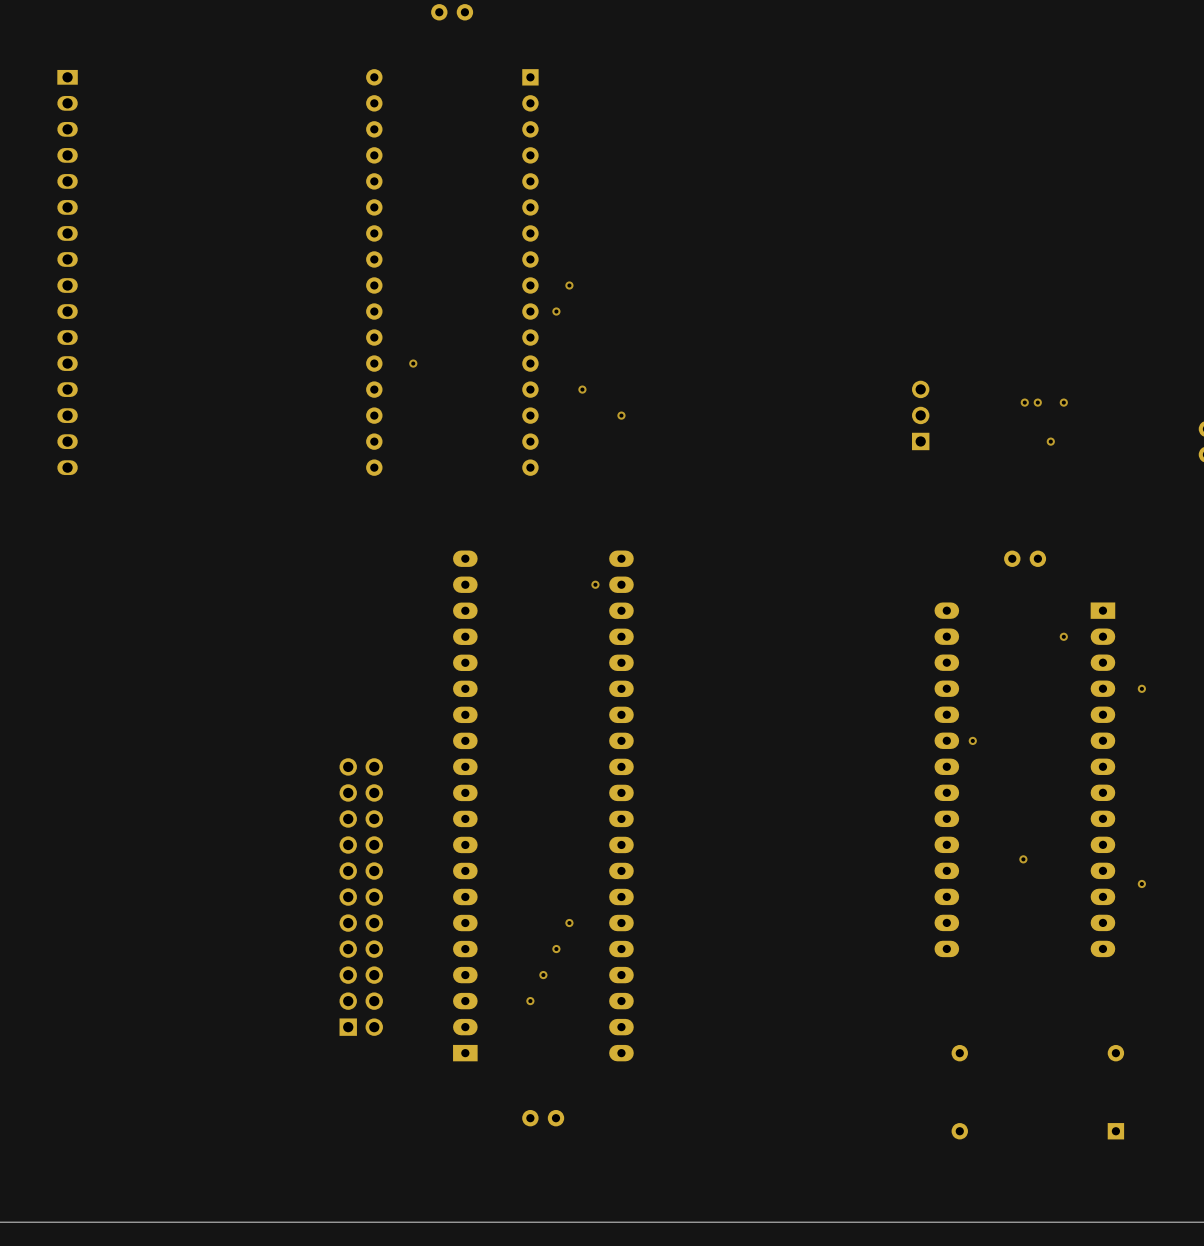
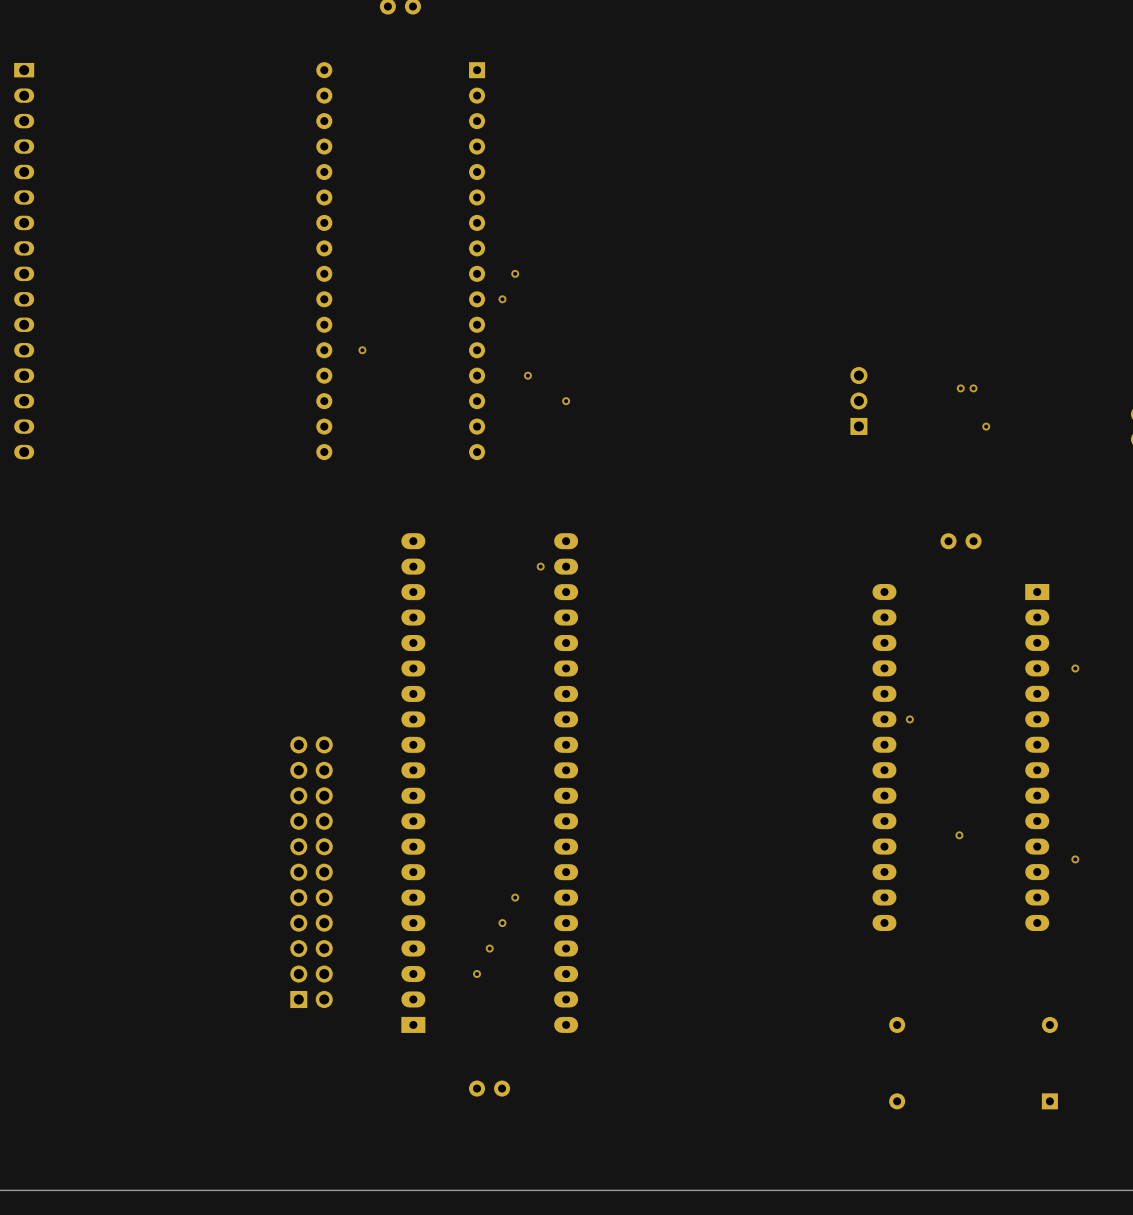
via: (1063, 402) -> none
via: (1063, 636) -> none

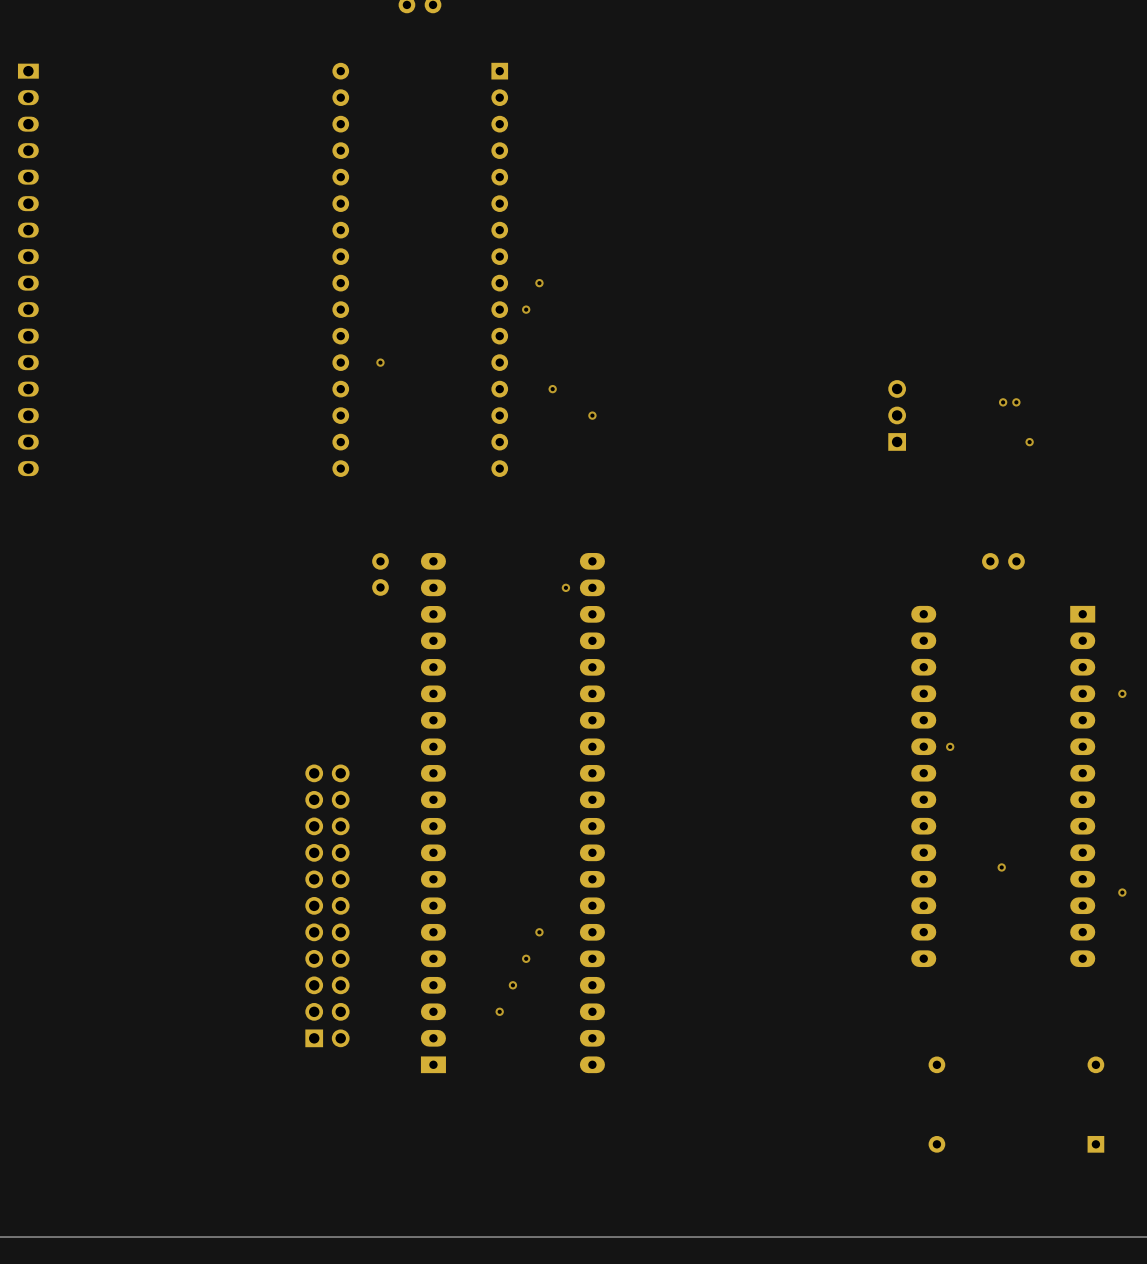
part: none -> (380, 574)
part: (489, 1088) -> none

